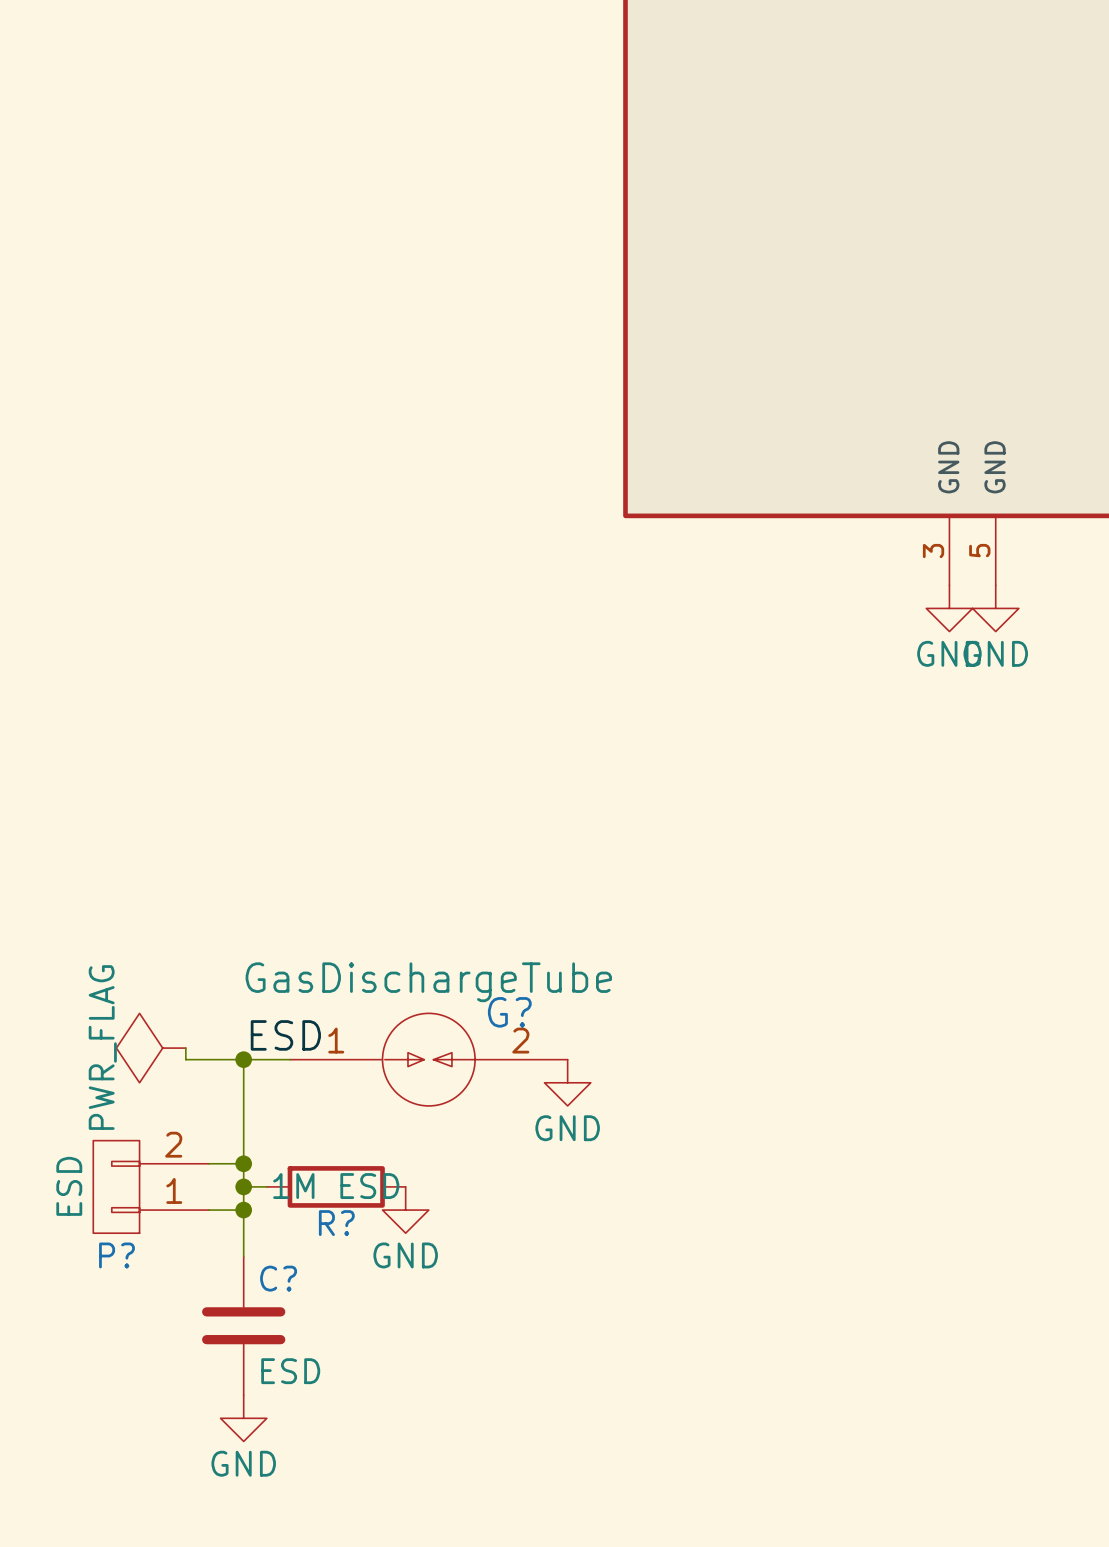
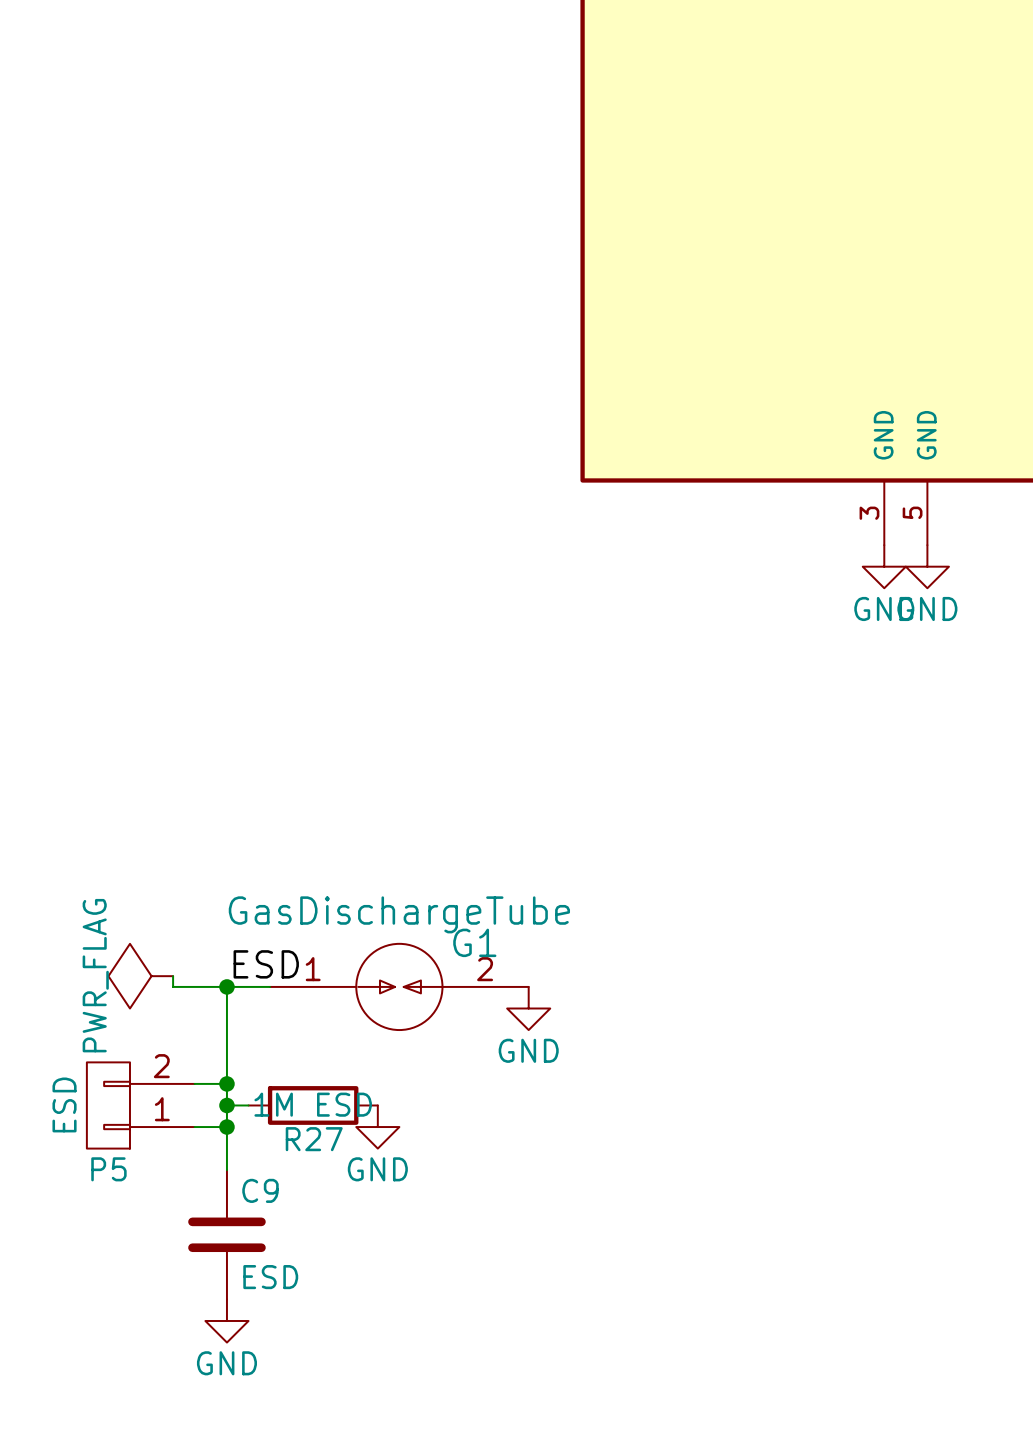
G? name: G? (509, 1012) -> G1 (474, 942)
R? name: R? (336, 1223) -> R27 (314, 1139)
P? name: P? (116, 1255) -> P5 (108, 1169)
C? name: C? (278, 1278) -> C9 (260, 1190)

